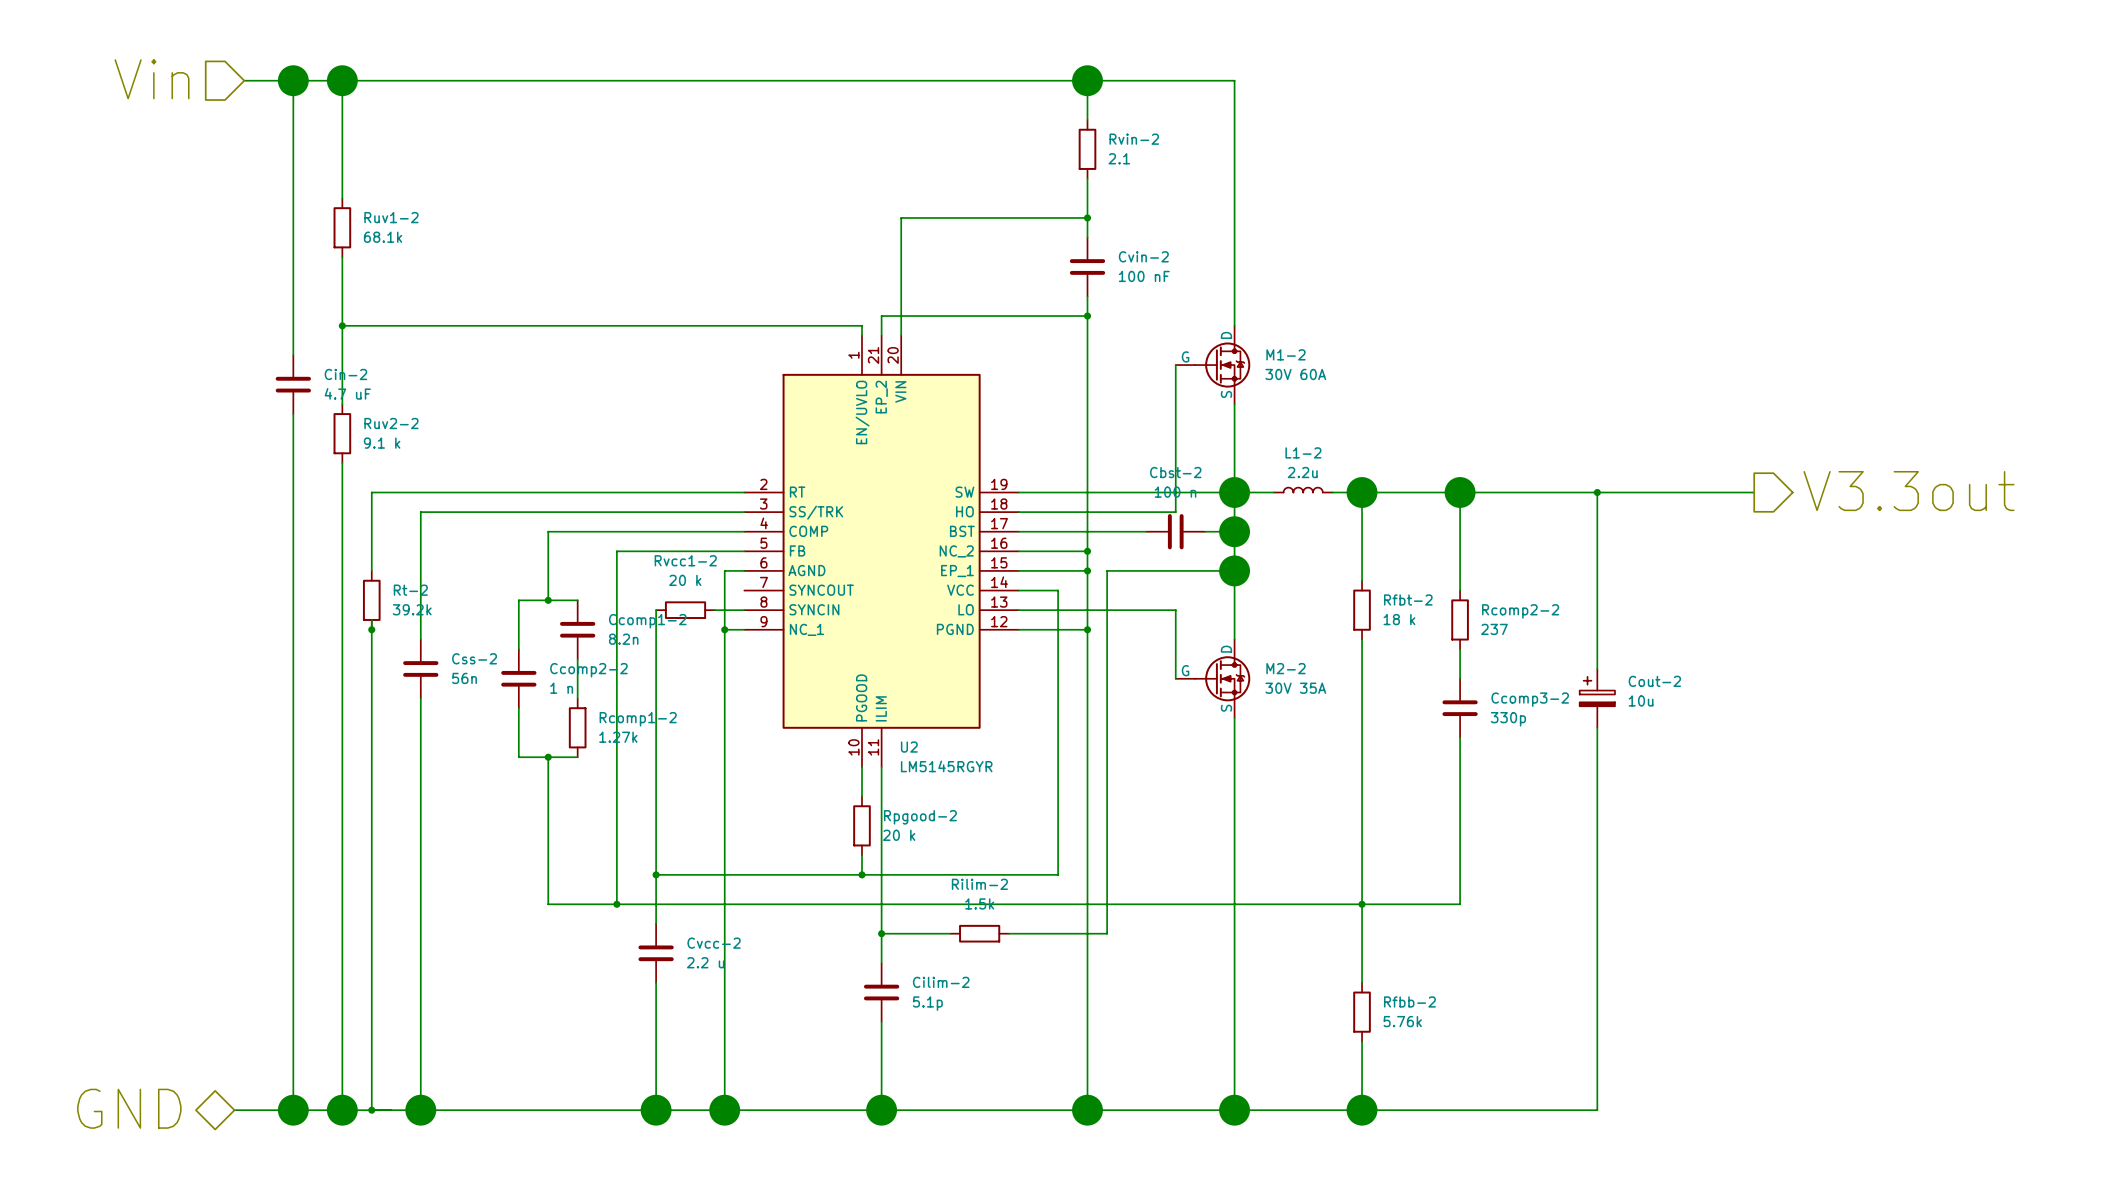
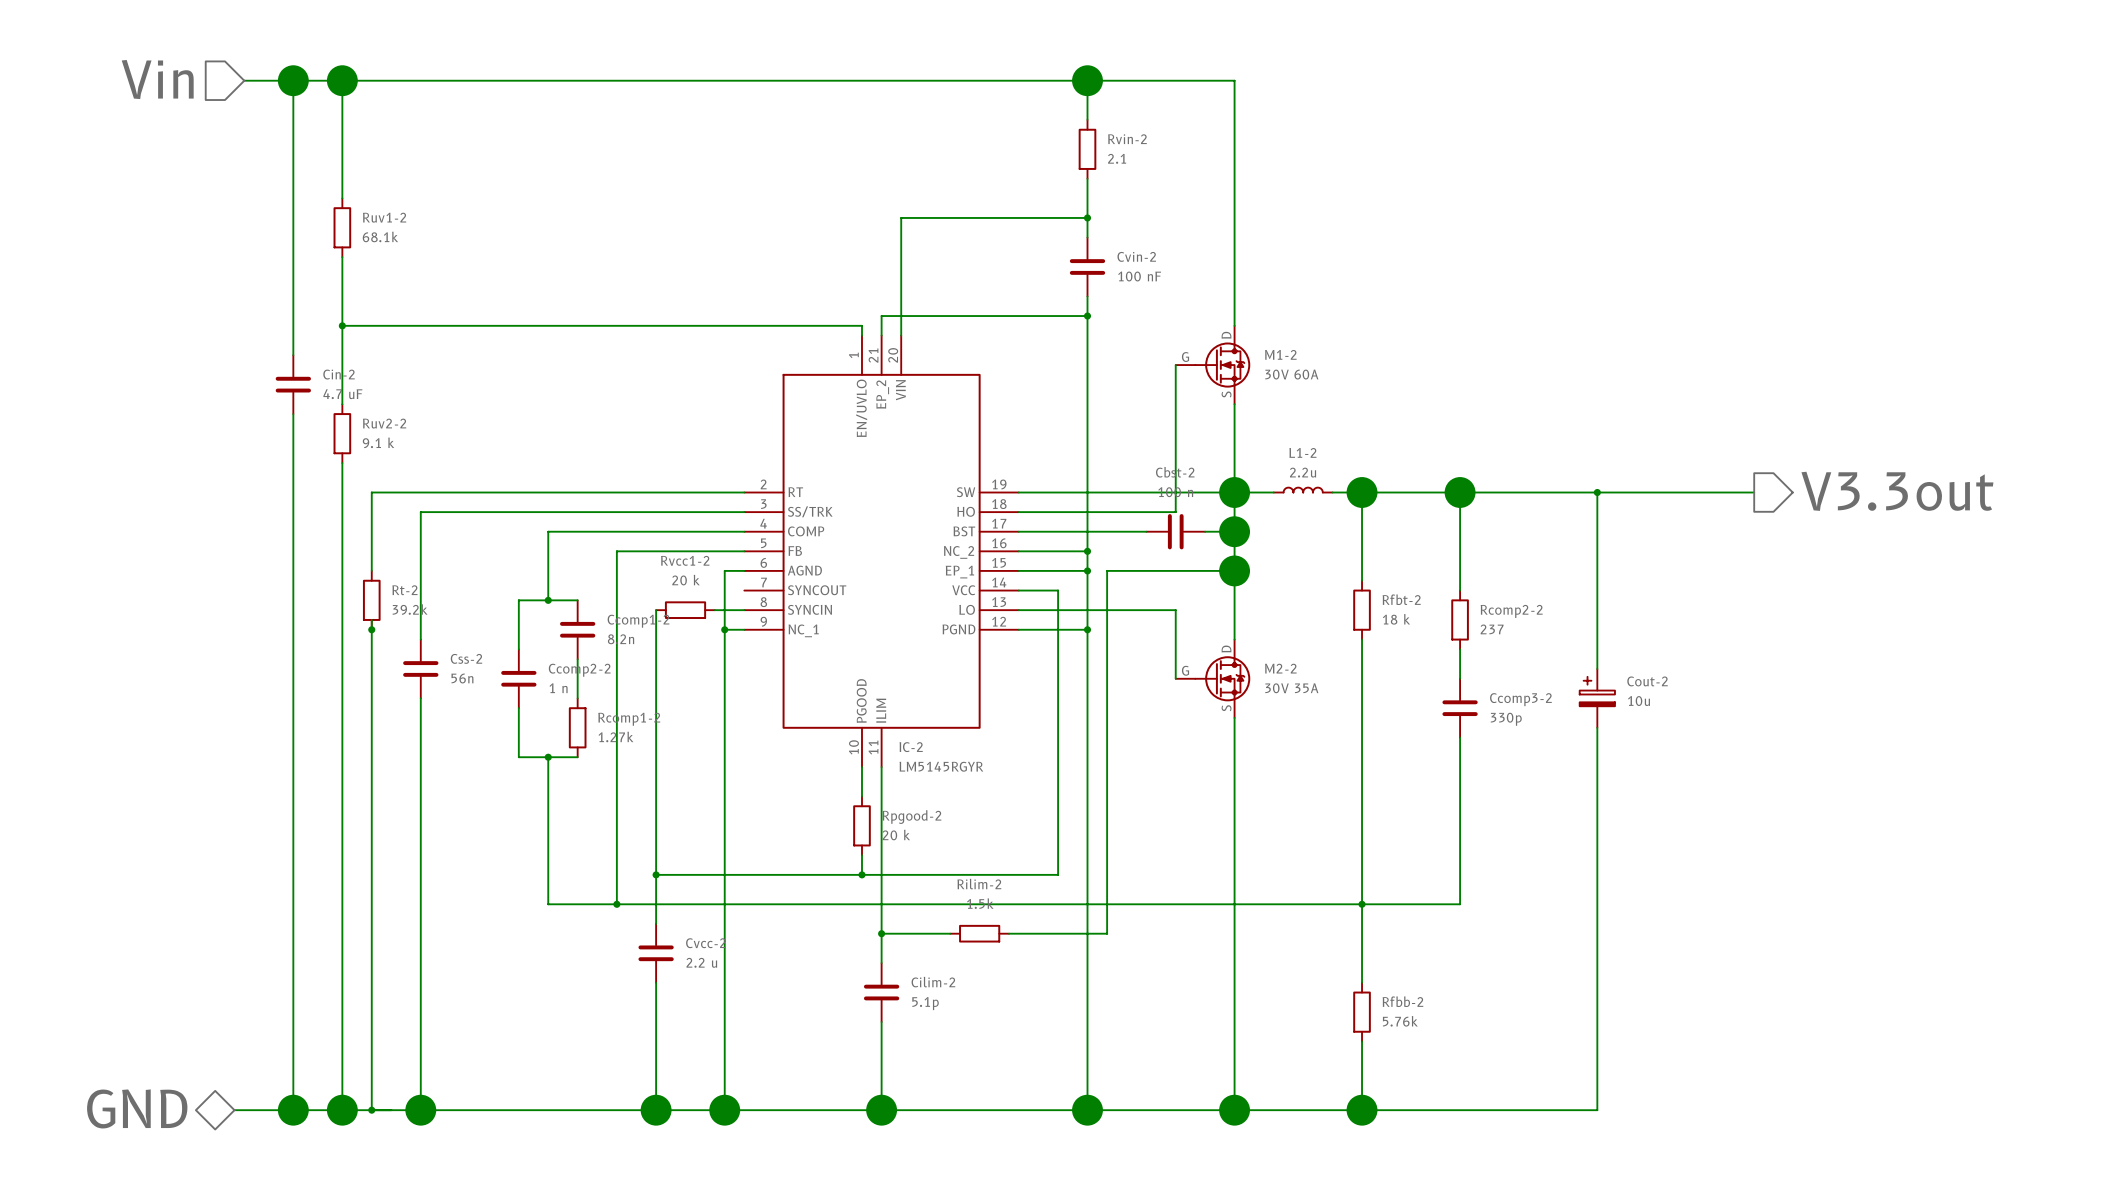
U2 name: U2 (909, 747) -> IC-2 (911, 747)

